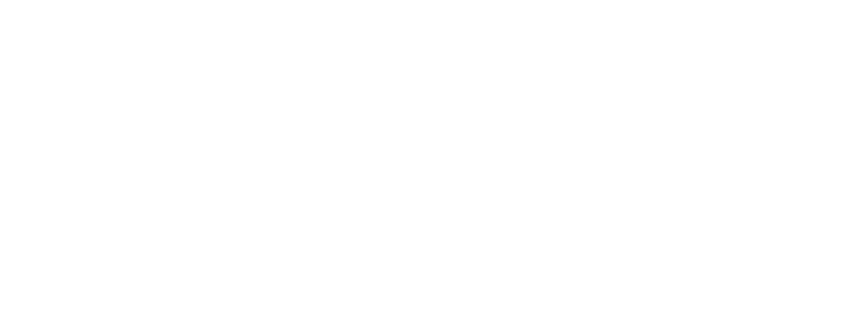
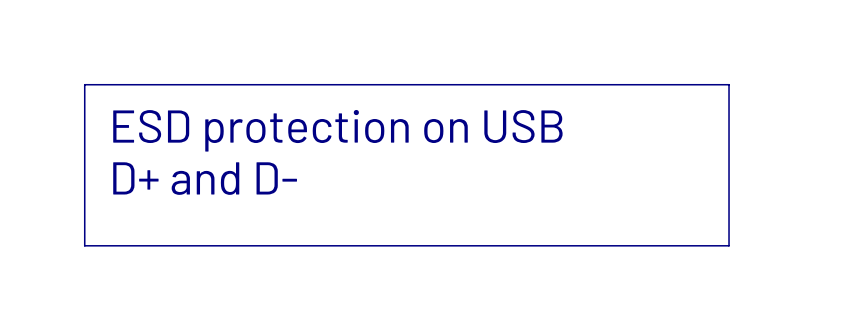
line: none -> (84, 84) (729, 84) (729, 245) (84, 245) (84, 84)
text: none -> ESD protection on USB (337, 130)
text: none -> D+ and D- (205, 178)

